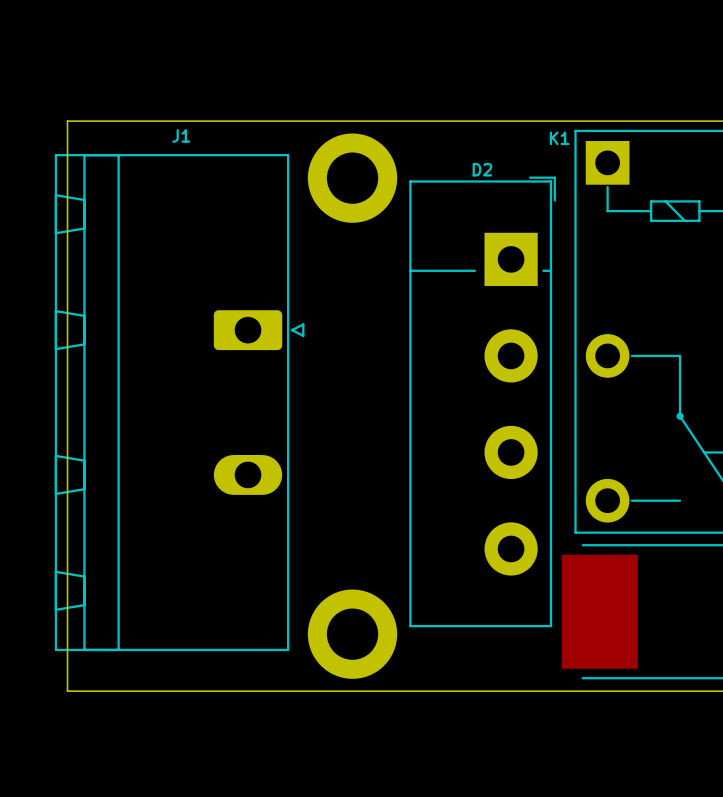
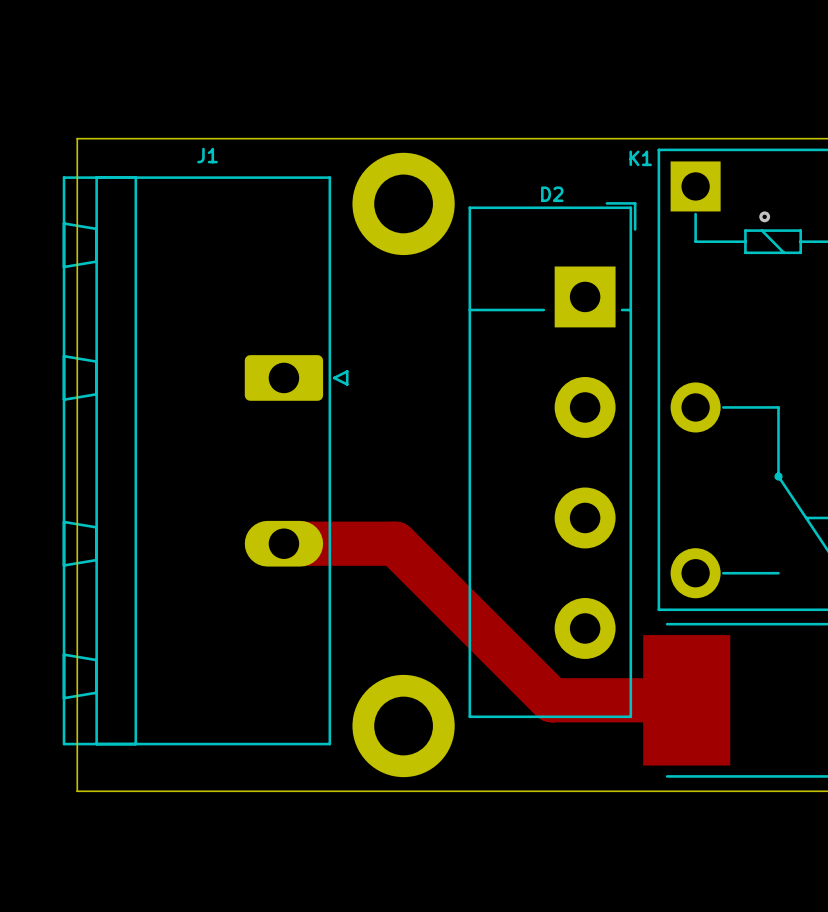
via: none -> (764, 216)
track: none -> (283, 543) (395, 543) (551, 700) (686, 700)

